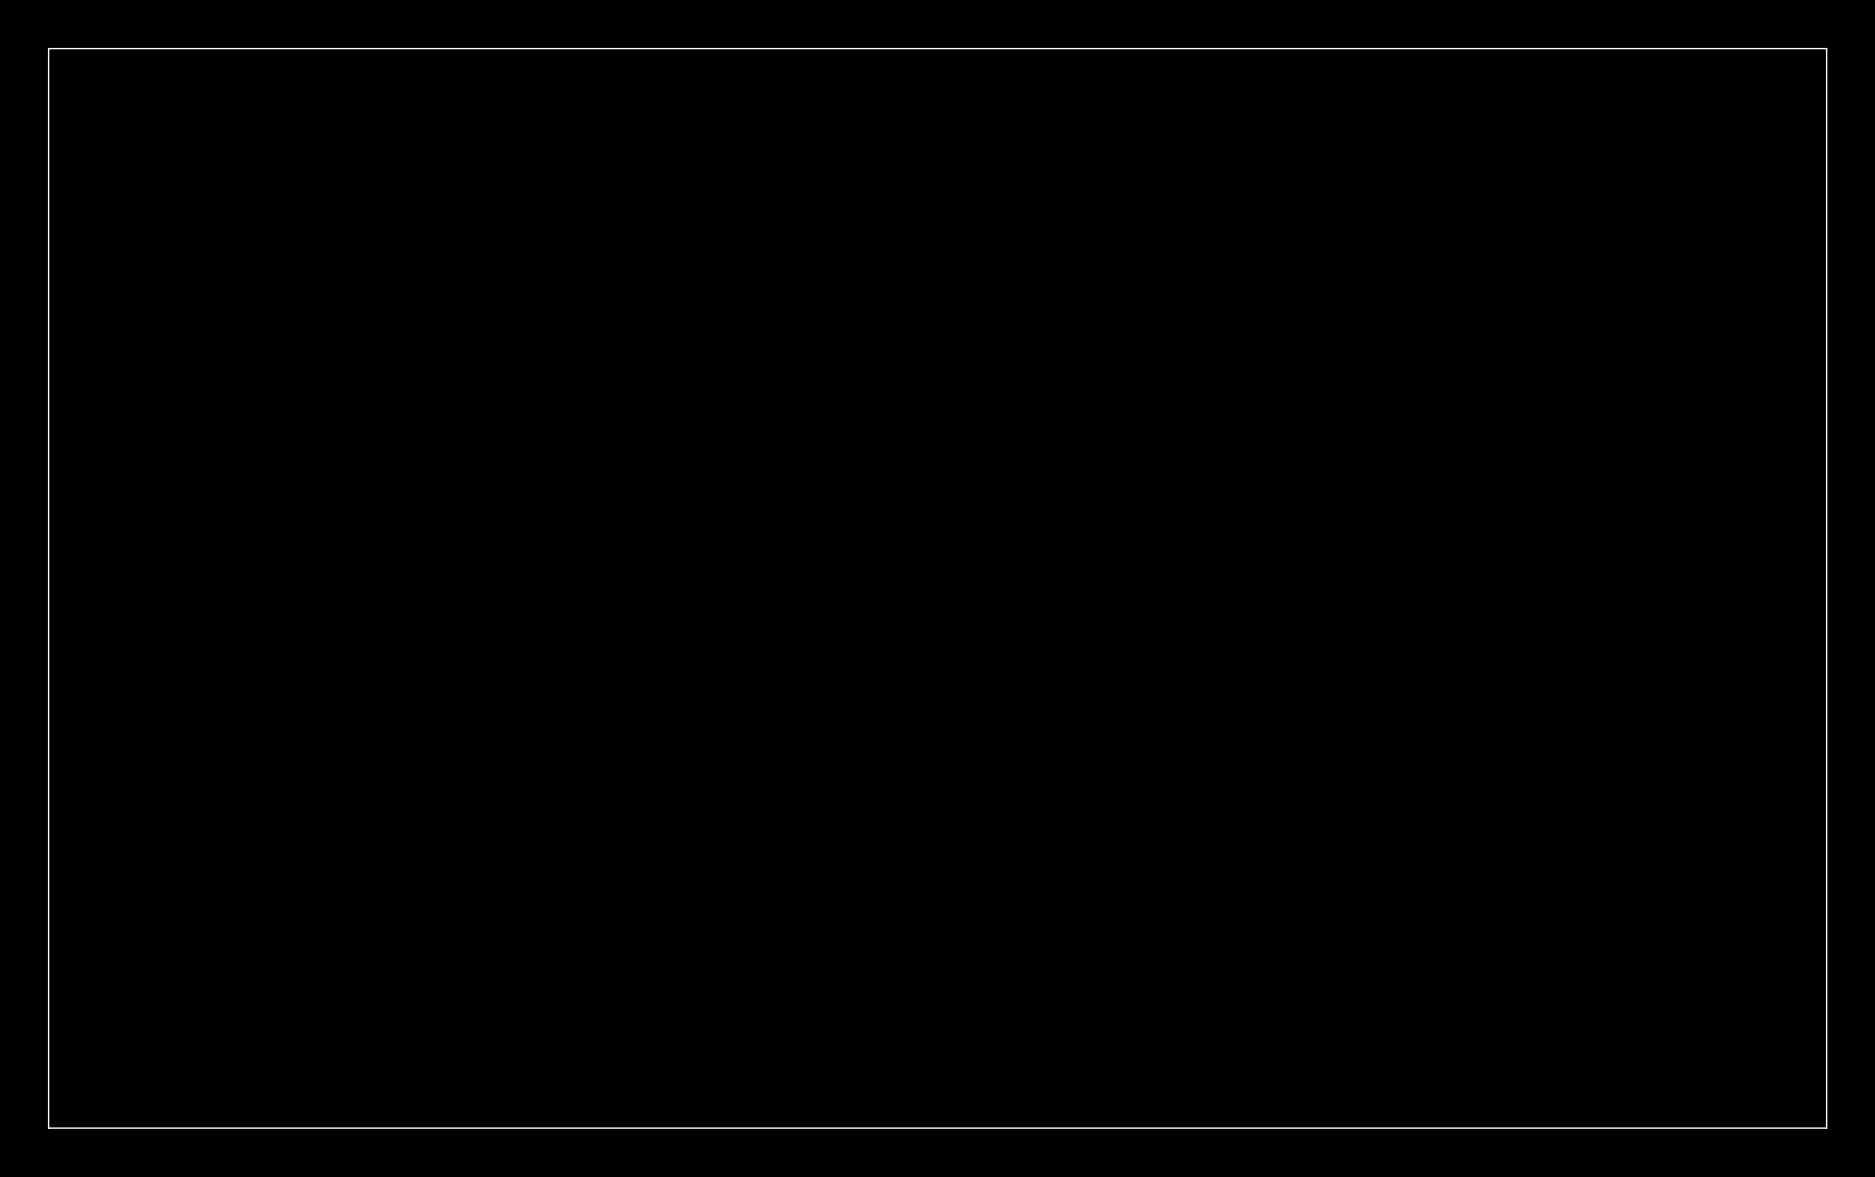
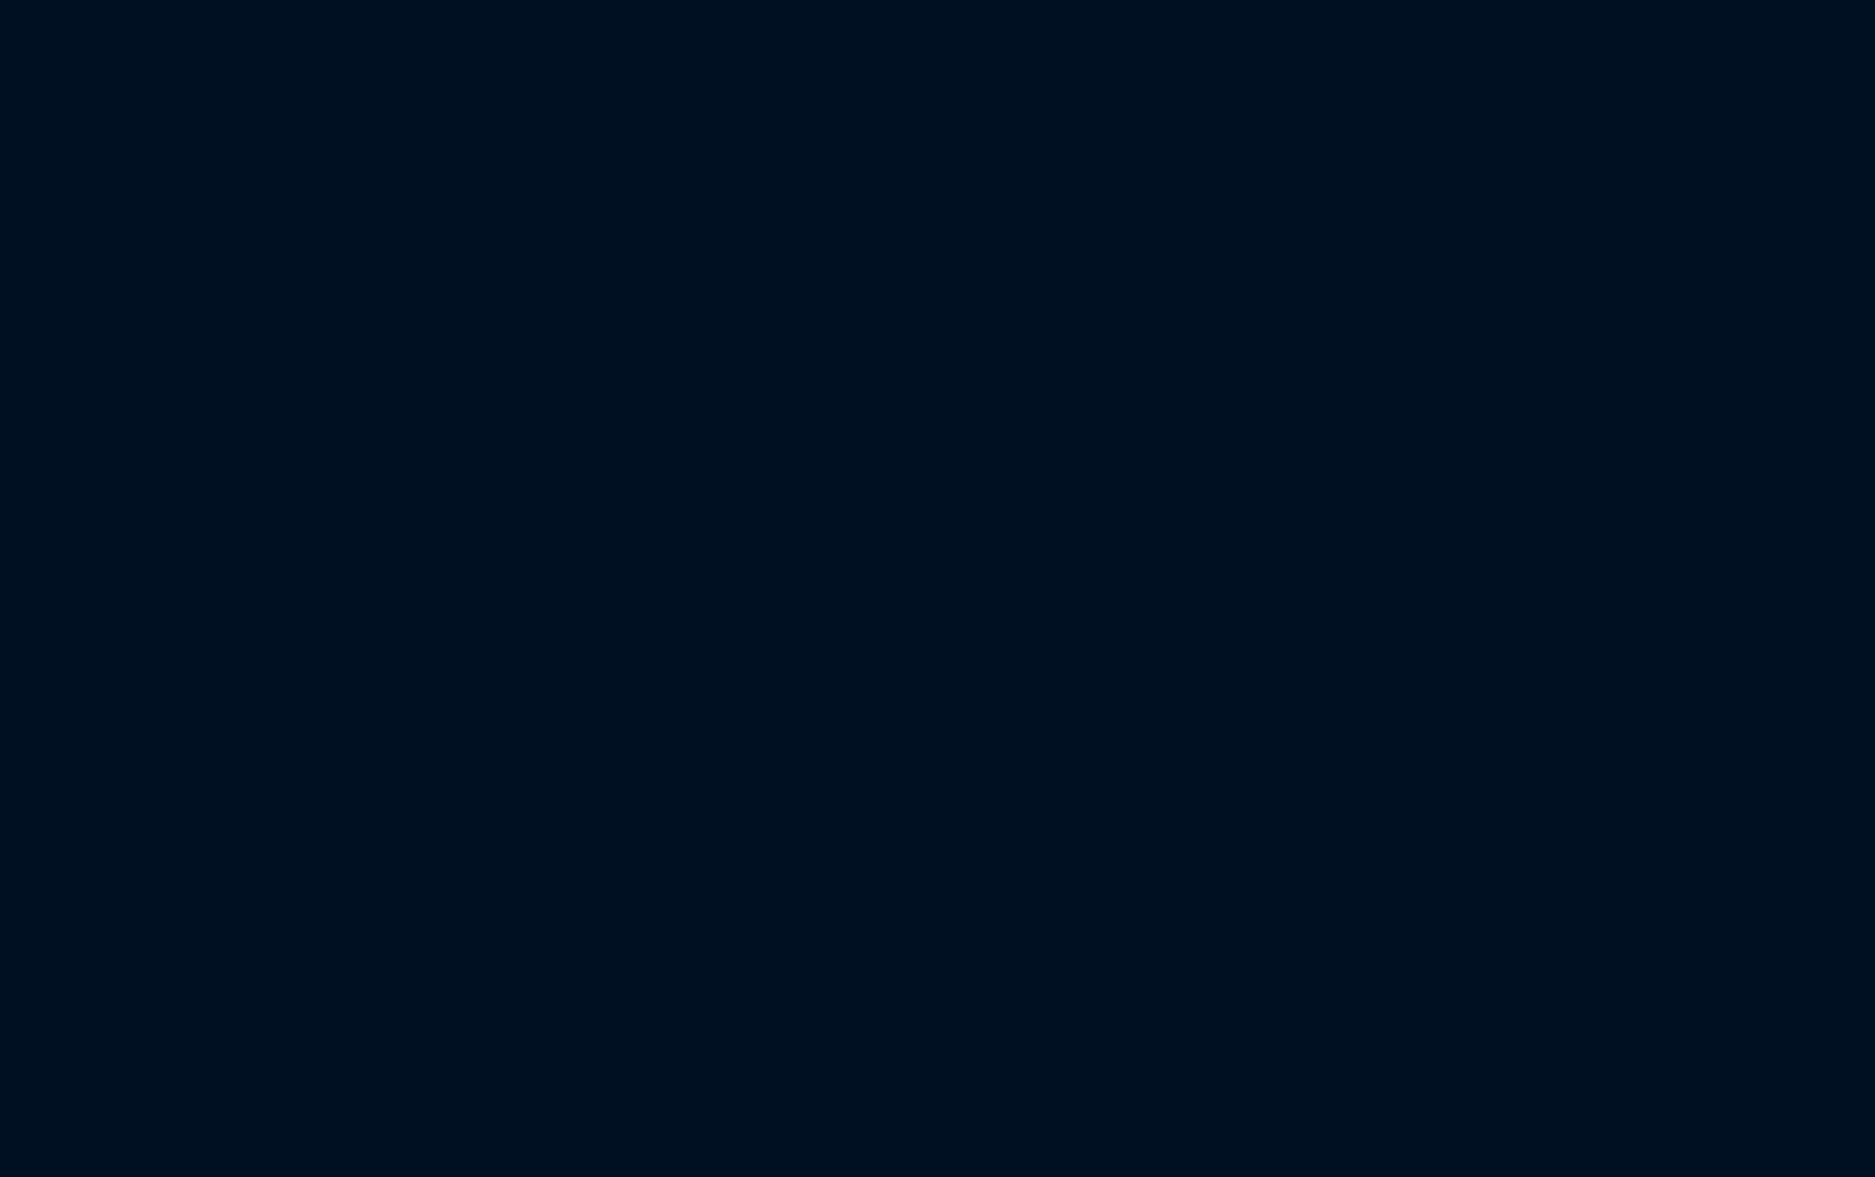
board edge: (48, 48) (1826, 48) (1826, 1128) (48, 1128) (48, 48) -> none

